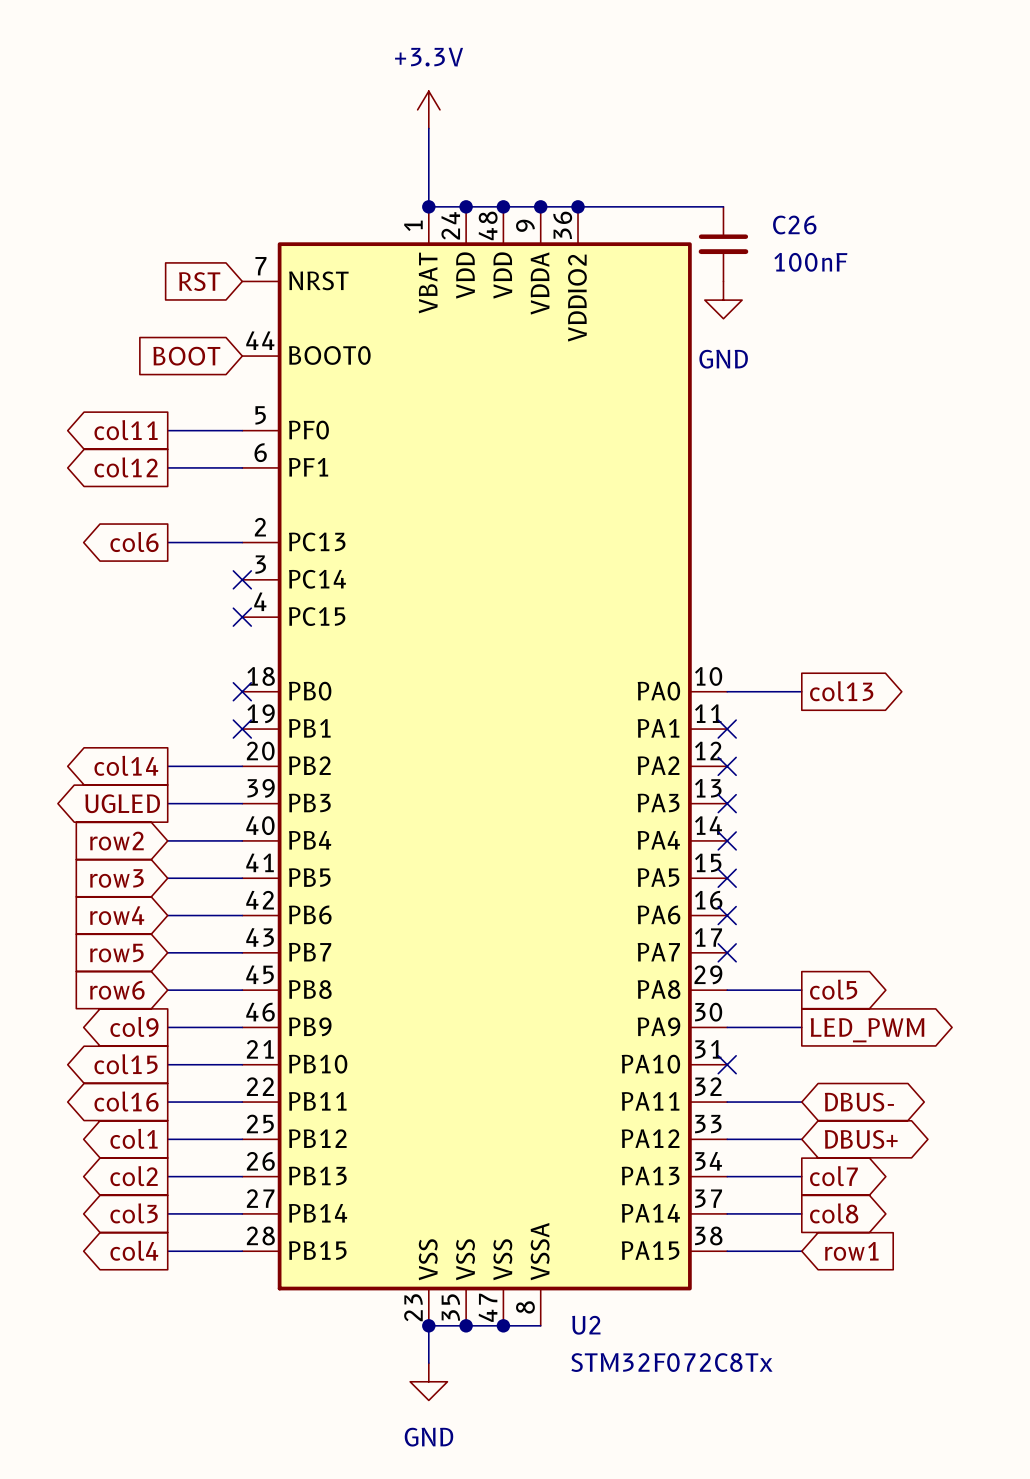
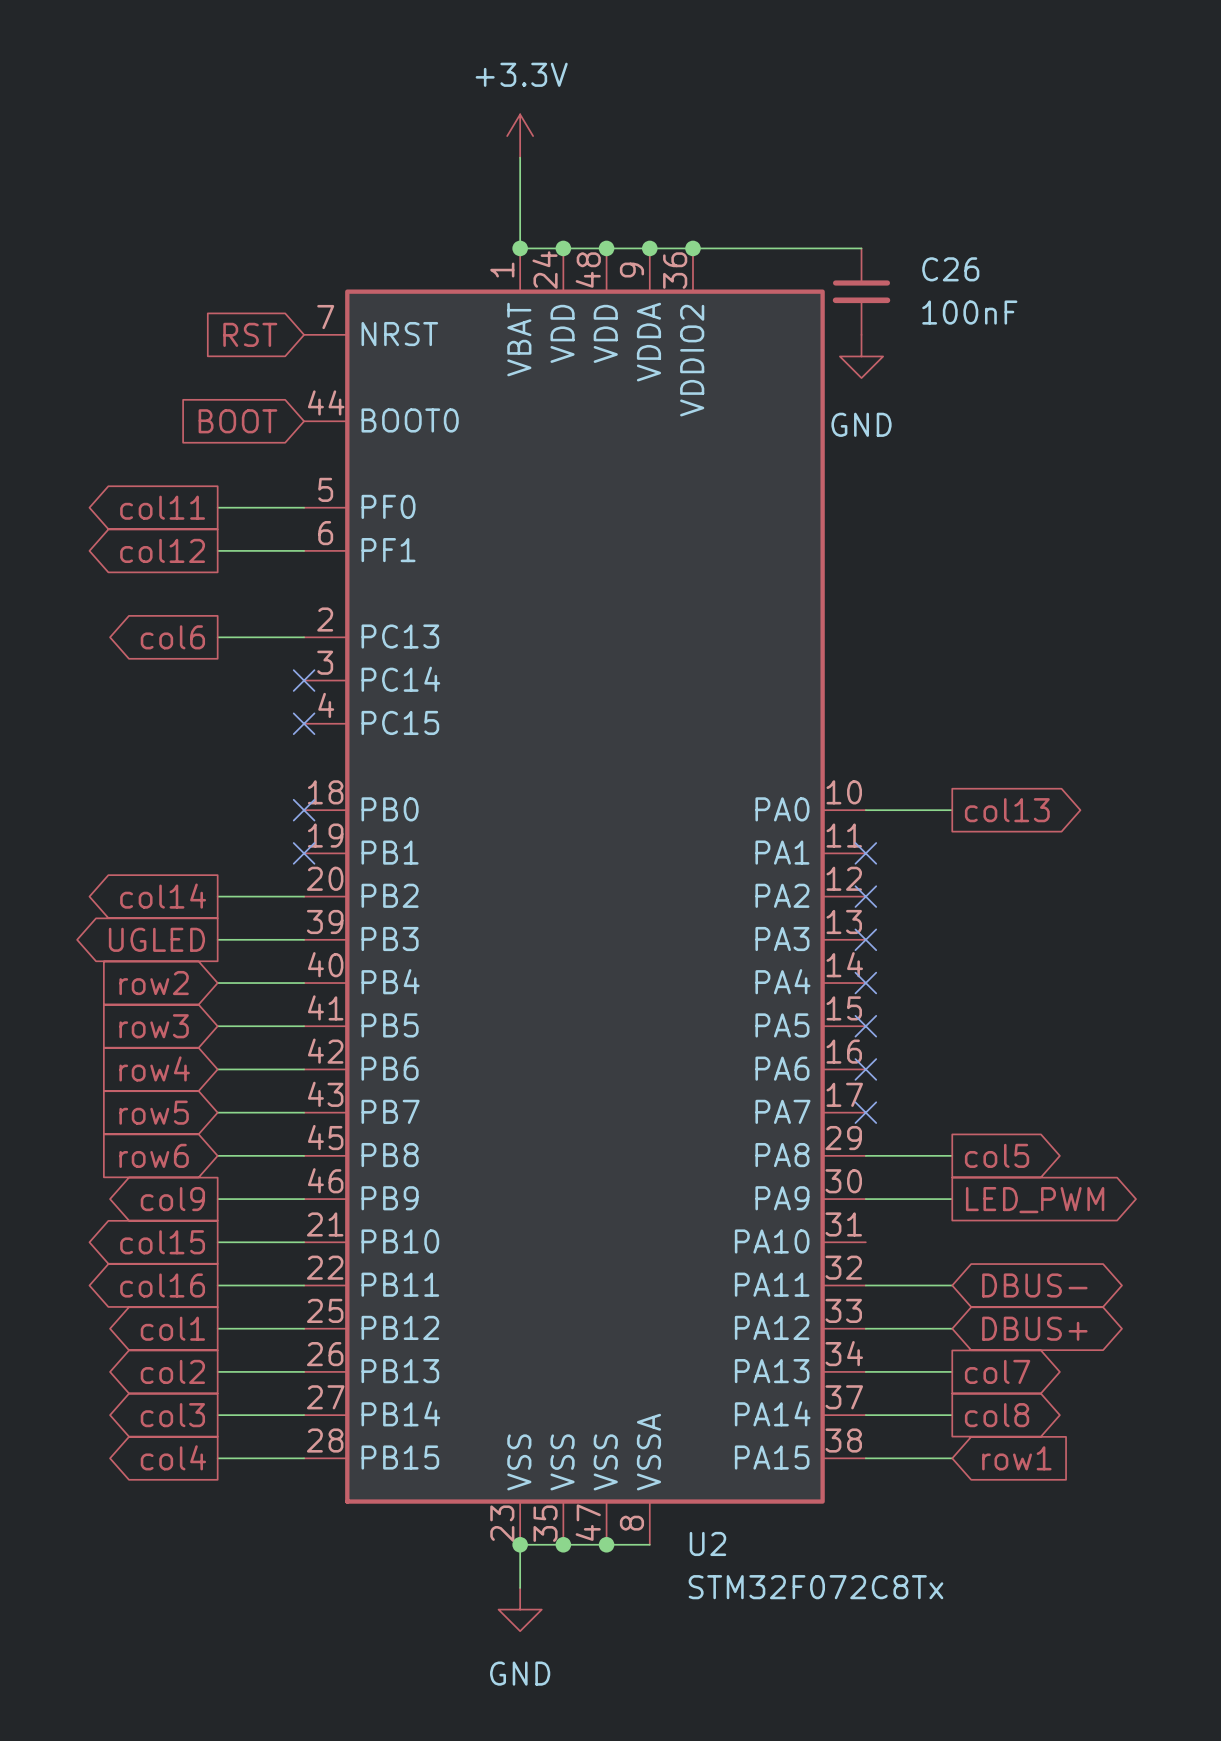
no-connect mark: (727, 1064) -> none

